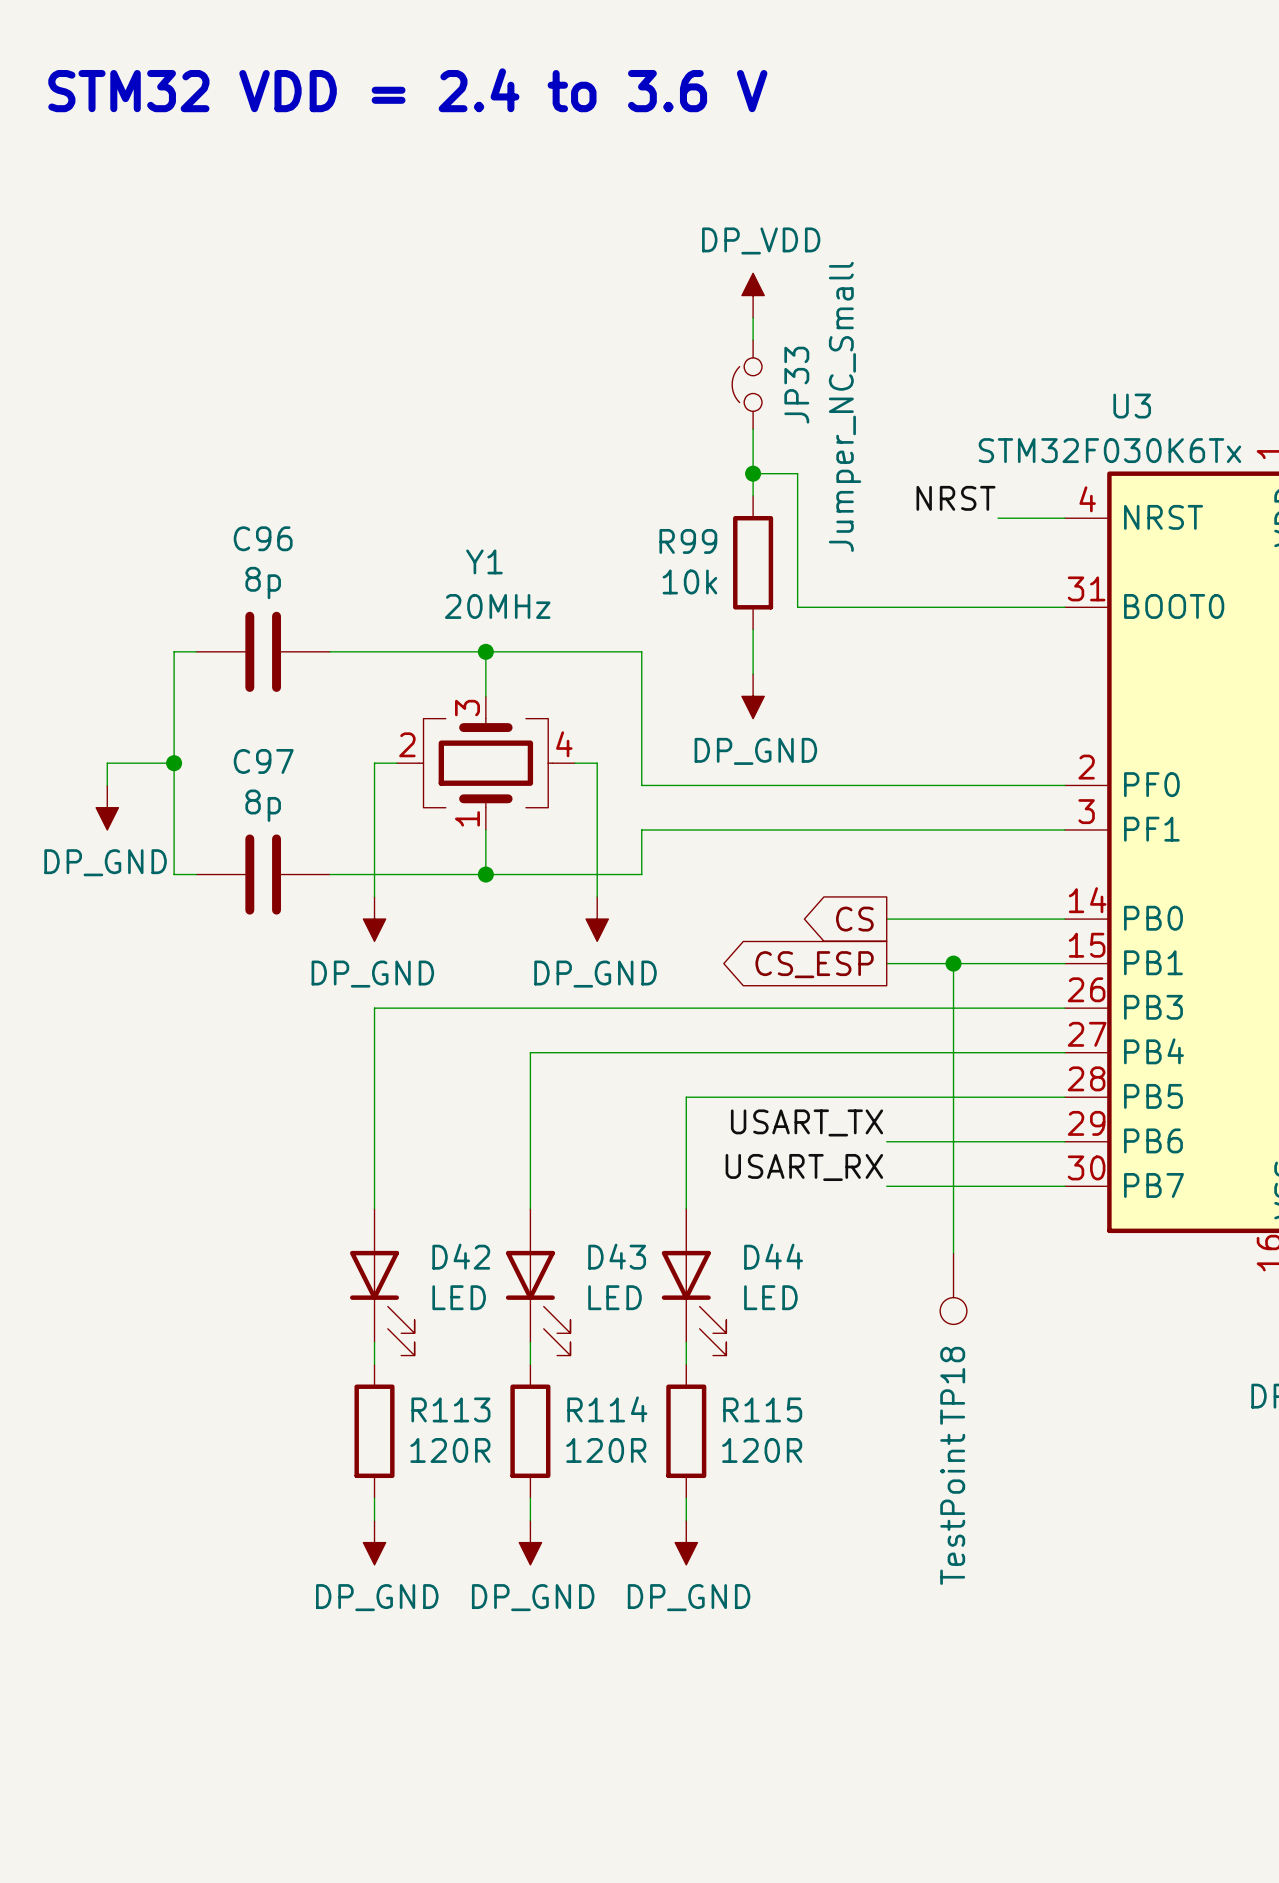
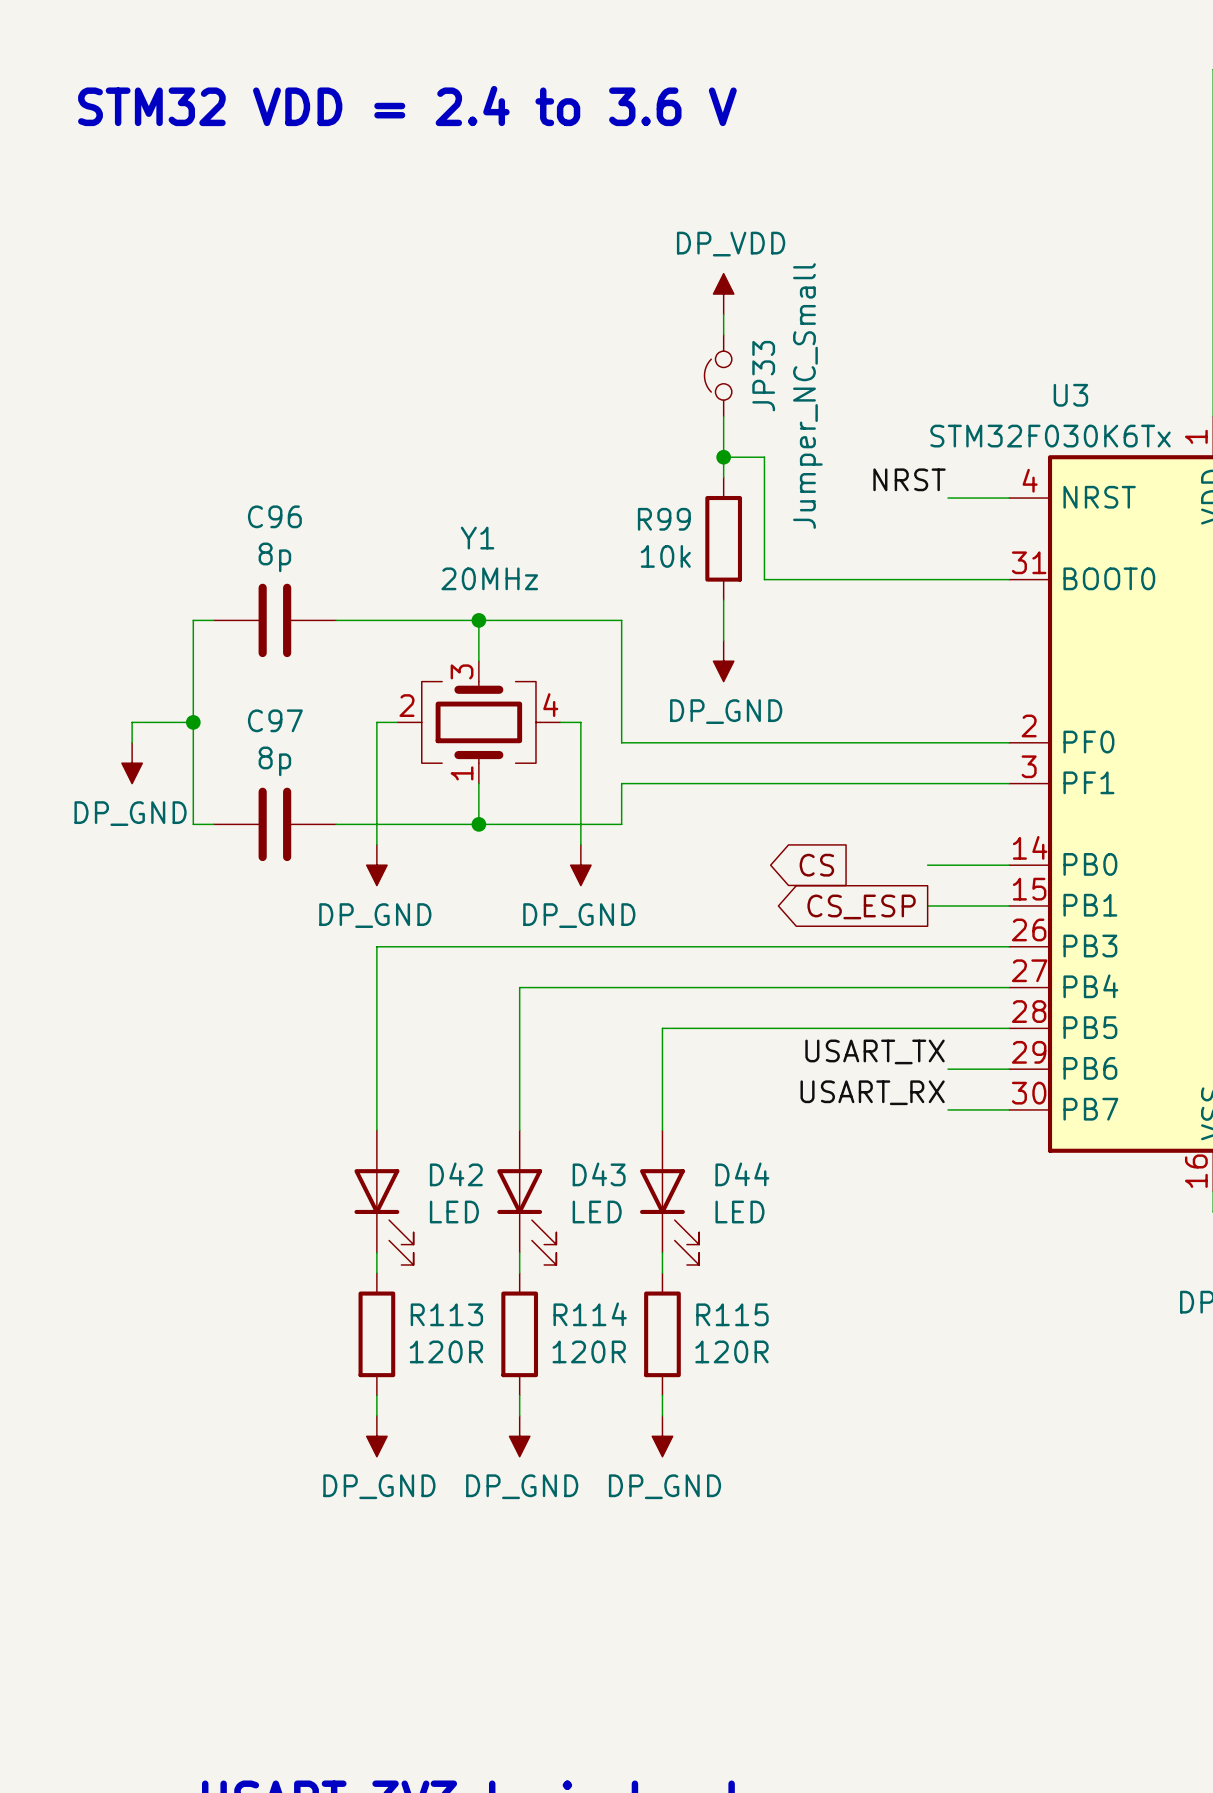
wire: (886, 919) (975, 919) -> none
wire: (886, 963) (975, 963) -> none
wire: (953, 963) (953, 1253) -> none
junction: (953, 963) -> none
global label position: CS_ESP (814, 964) -> CS_ESP (861, 906)
label position: USART_TX (807, 1122) -> USART_TX (875, 1051)
wire: (886, 1141) (998, 1141) -> none
label position: USART_RX (804, 1167) -> USART_RX (872, 1092)
wire: (886, 1186) (998, 1186) -> none
TP18: TestPoint (953, 1288) -> none

